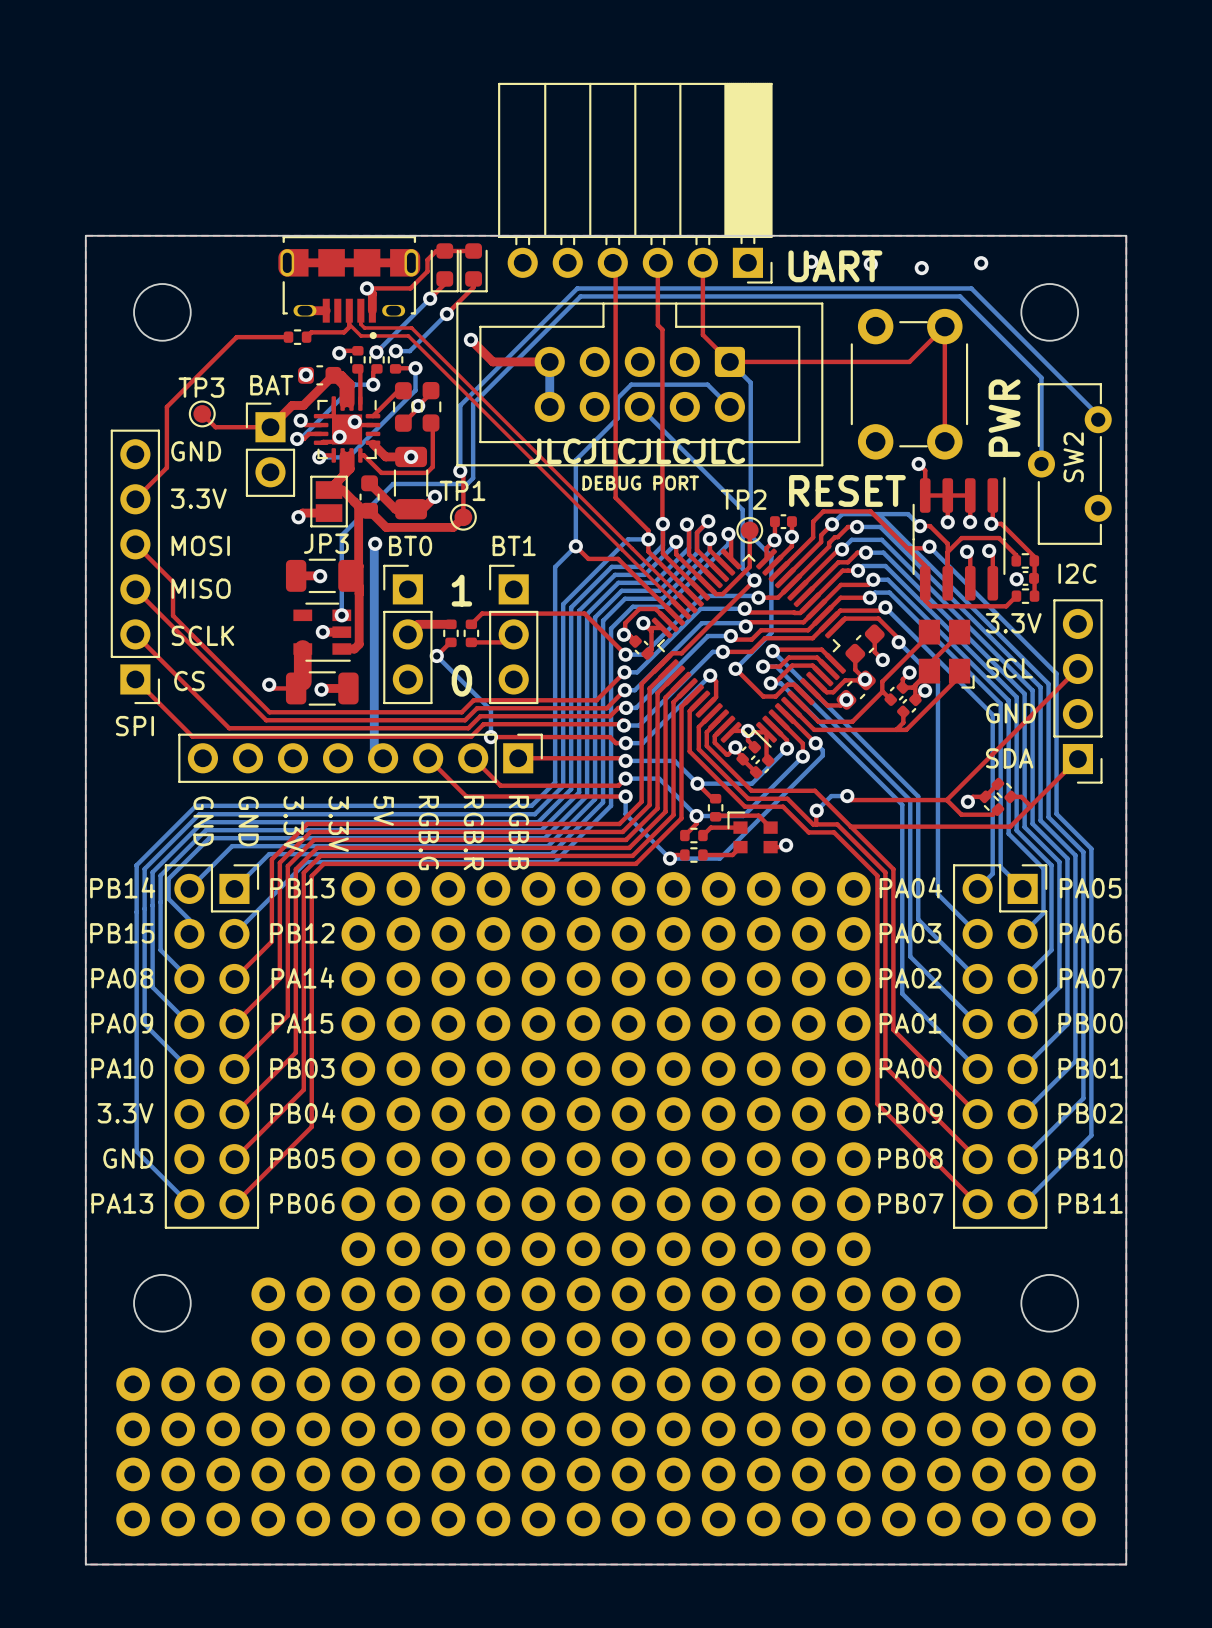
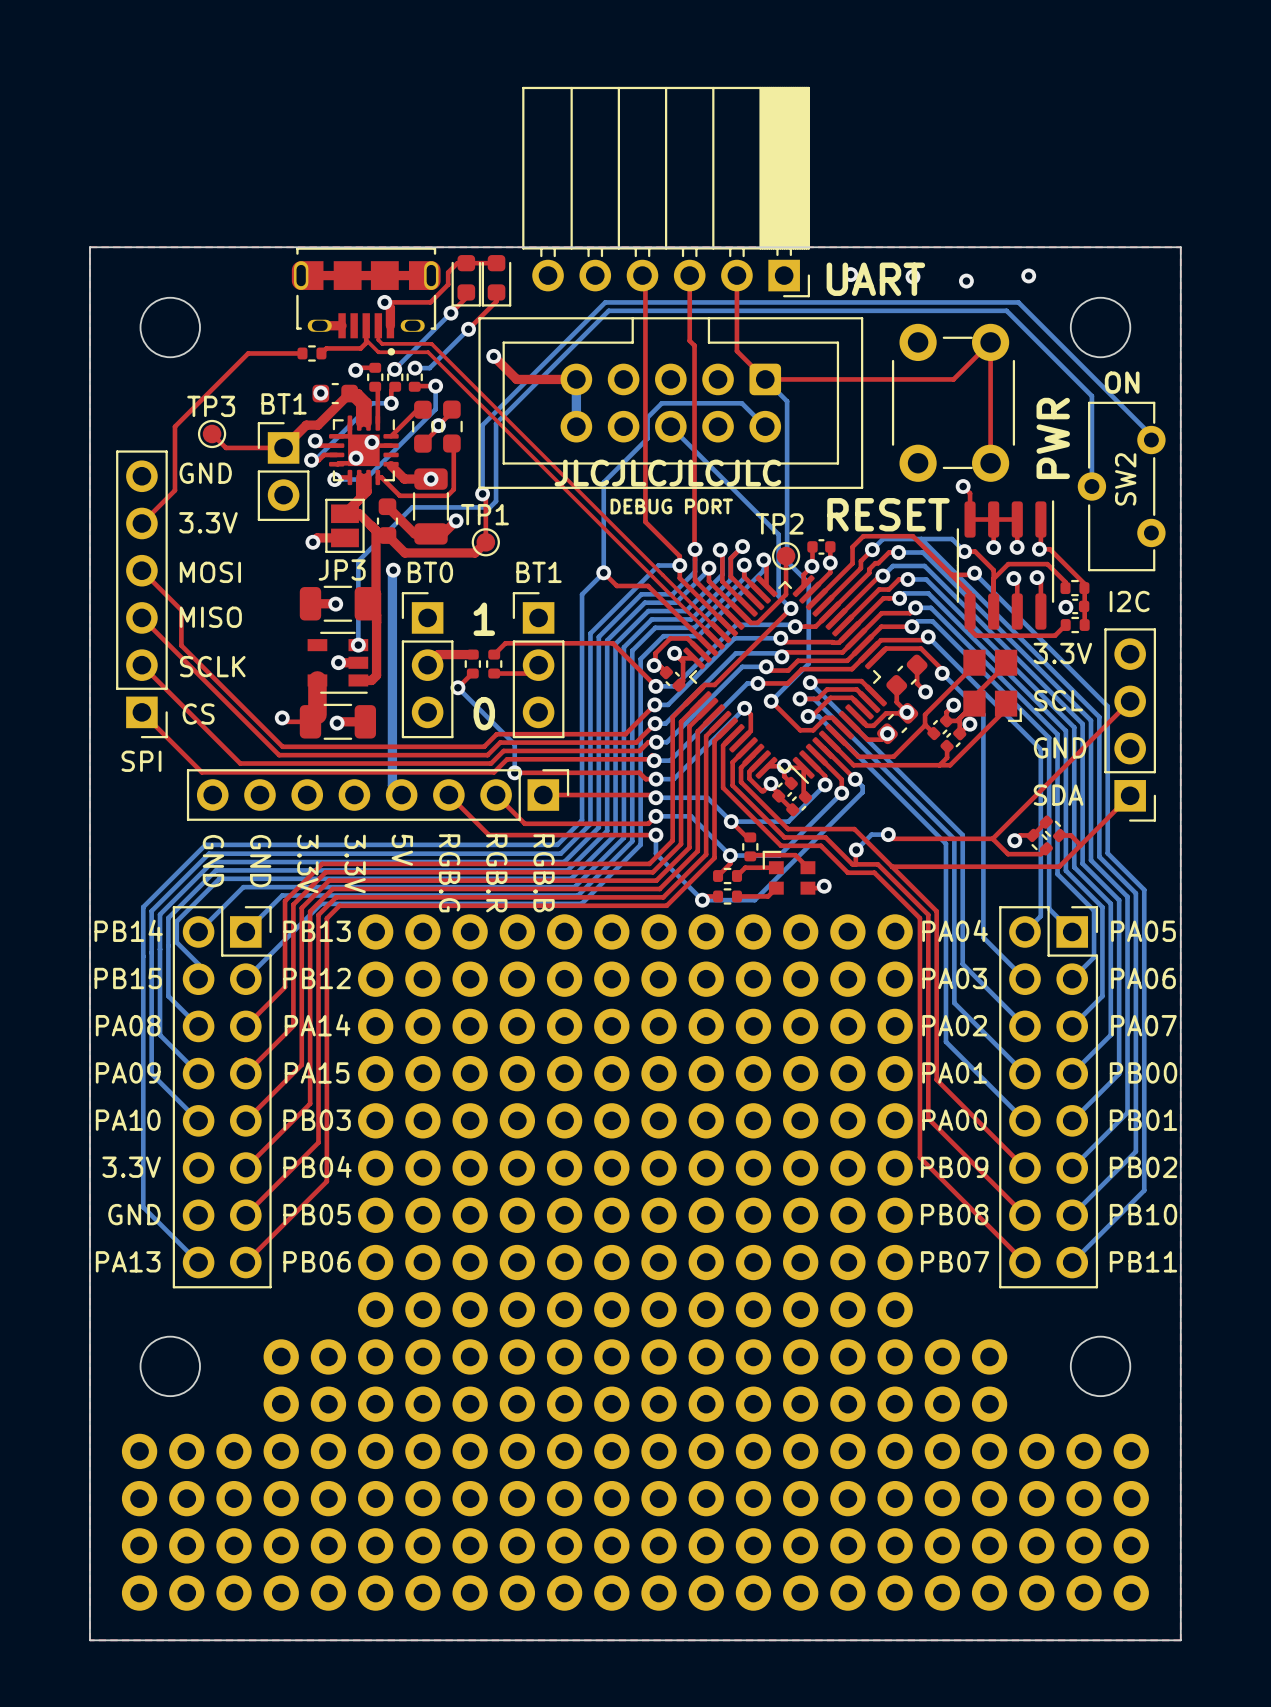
text: none -> ON (1122, 382)
BAT name: BAT (271, 385) -> BT1 (284, 403)

